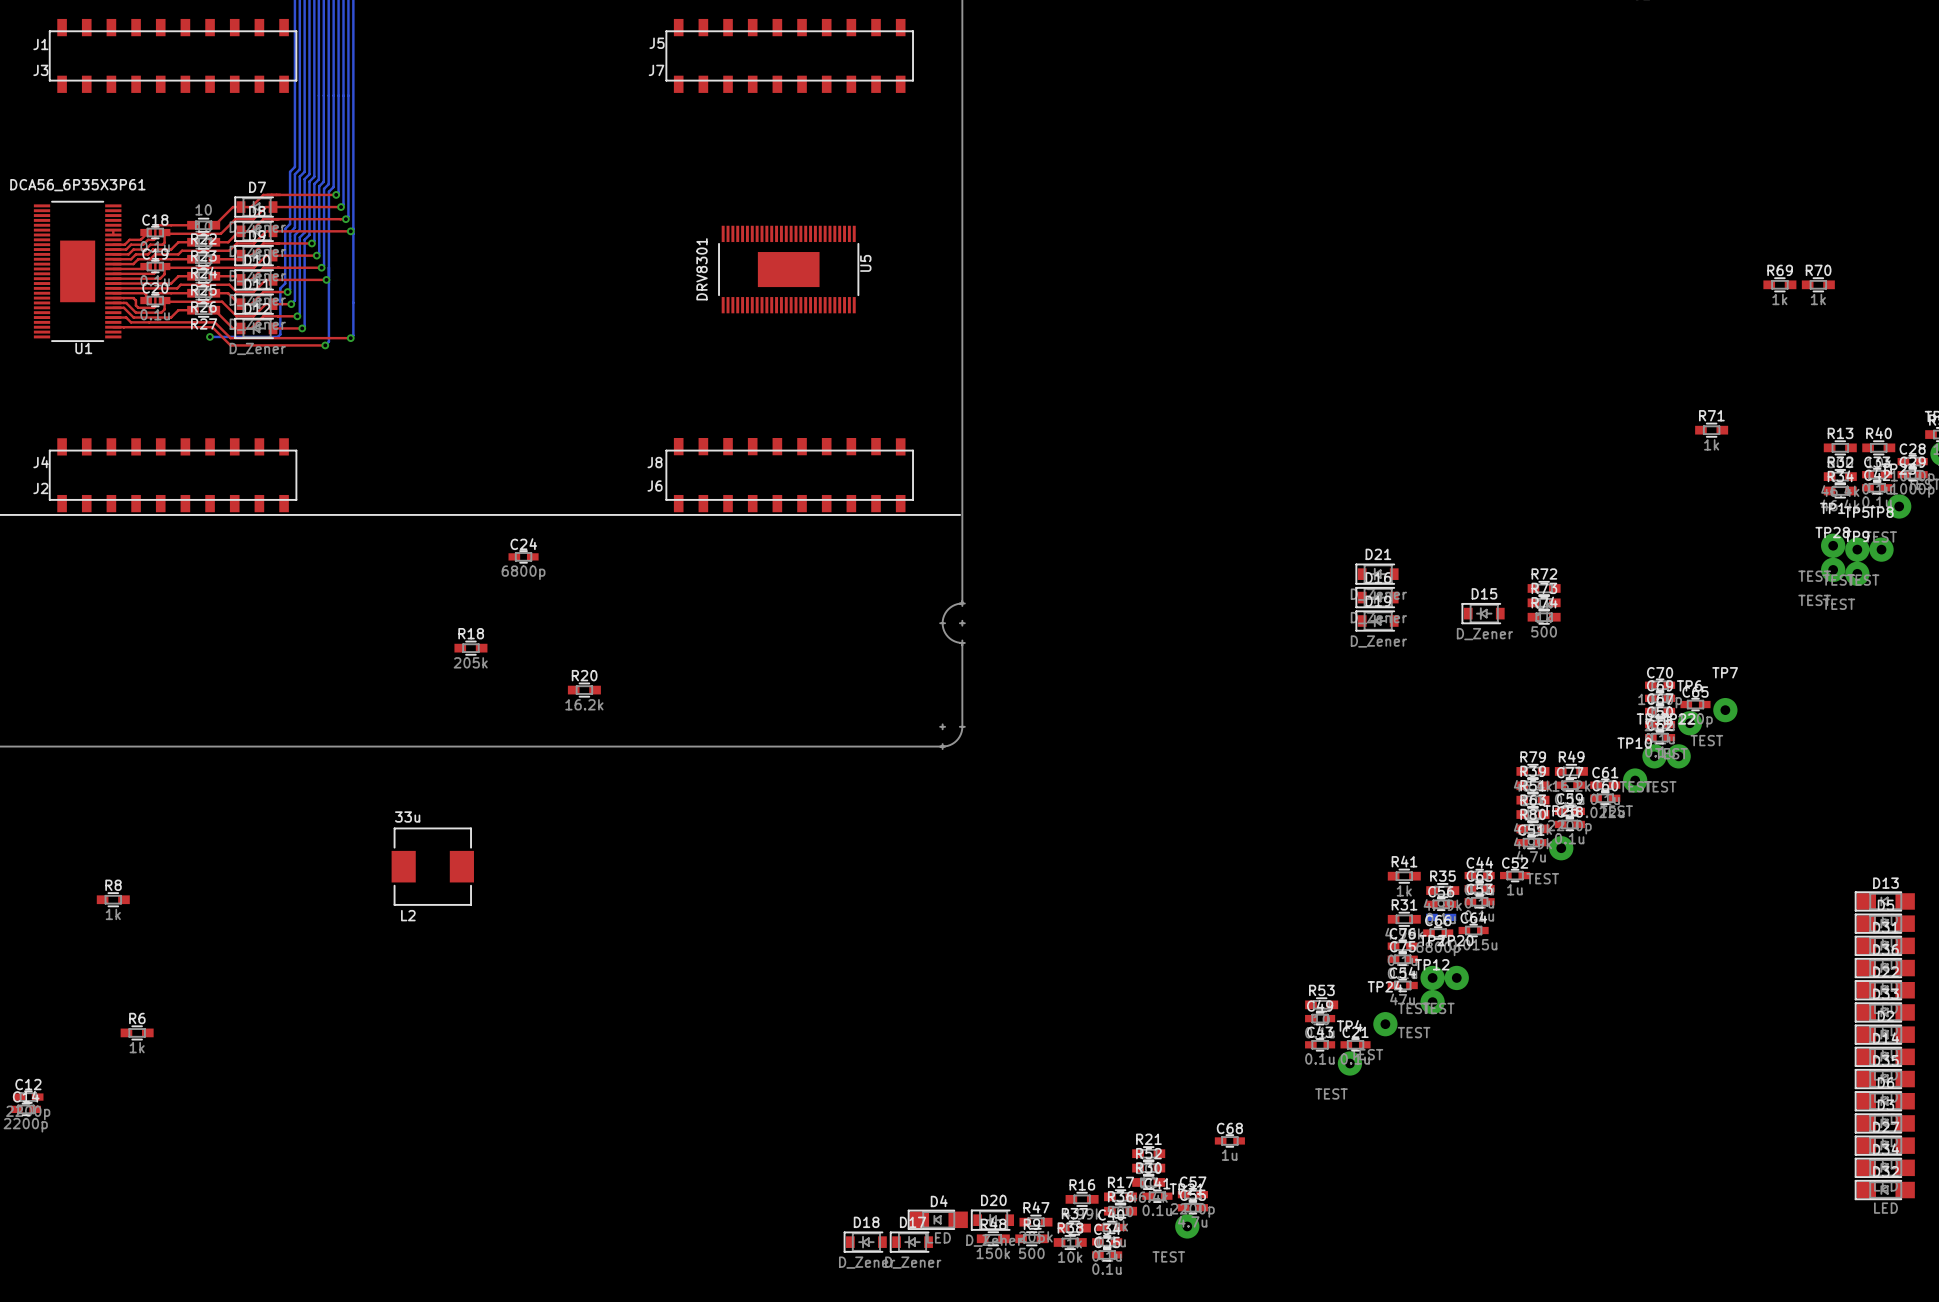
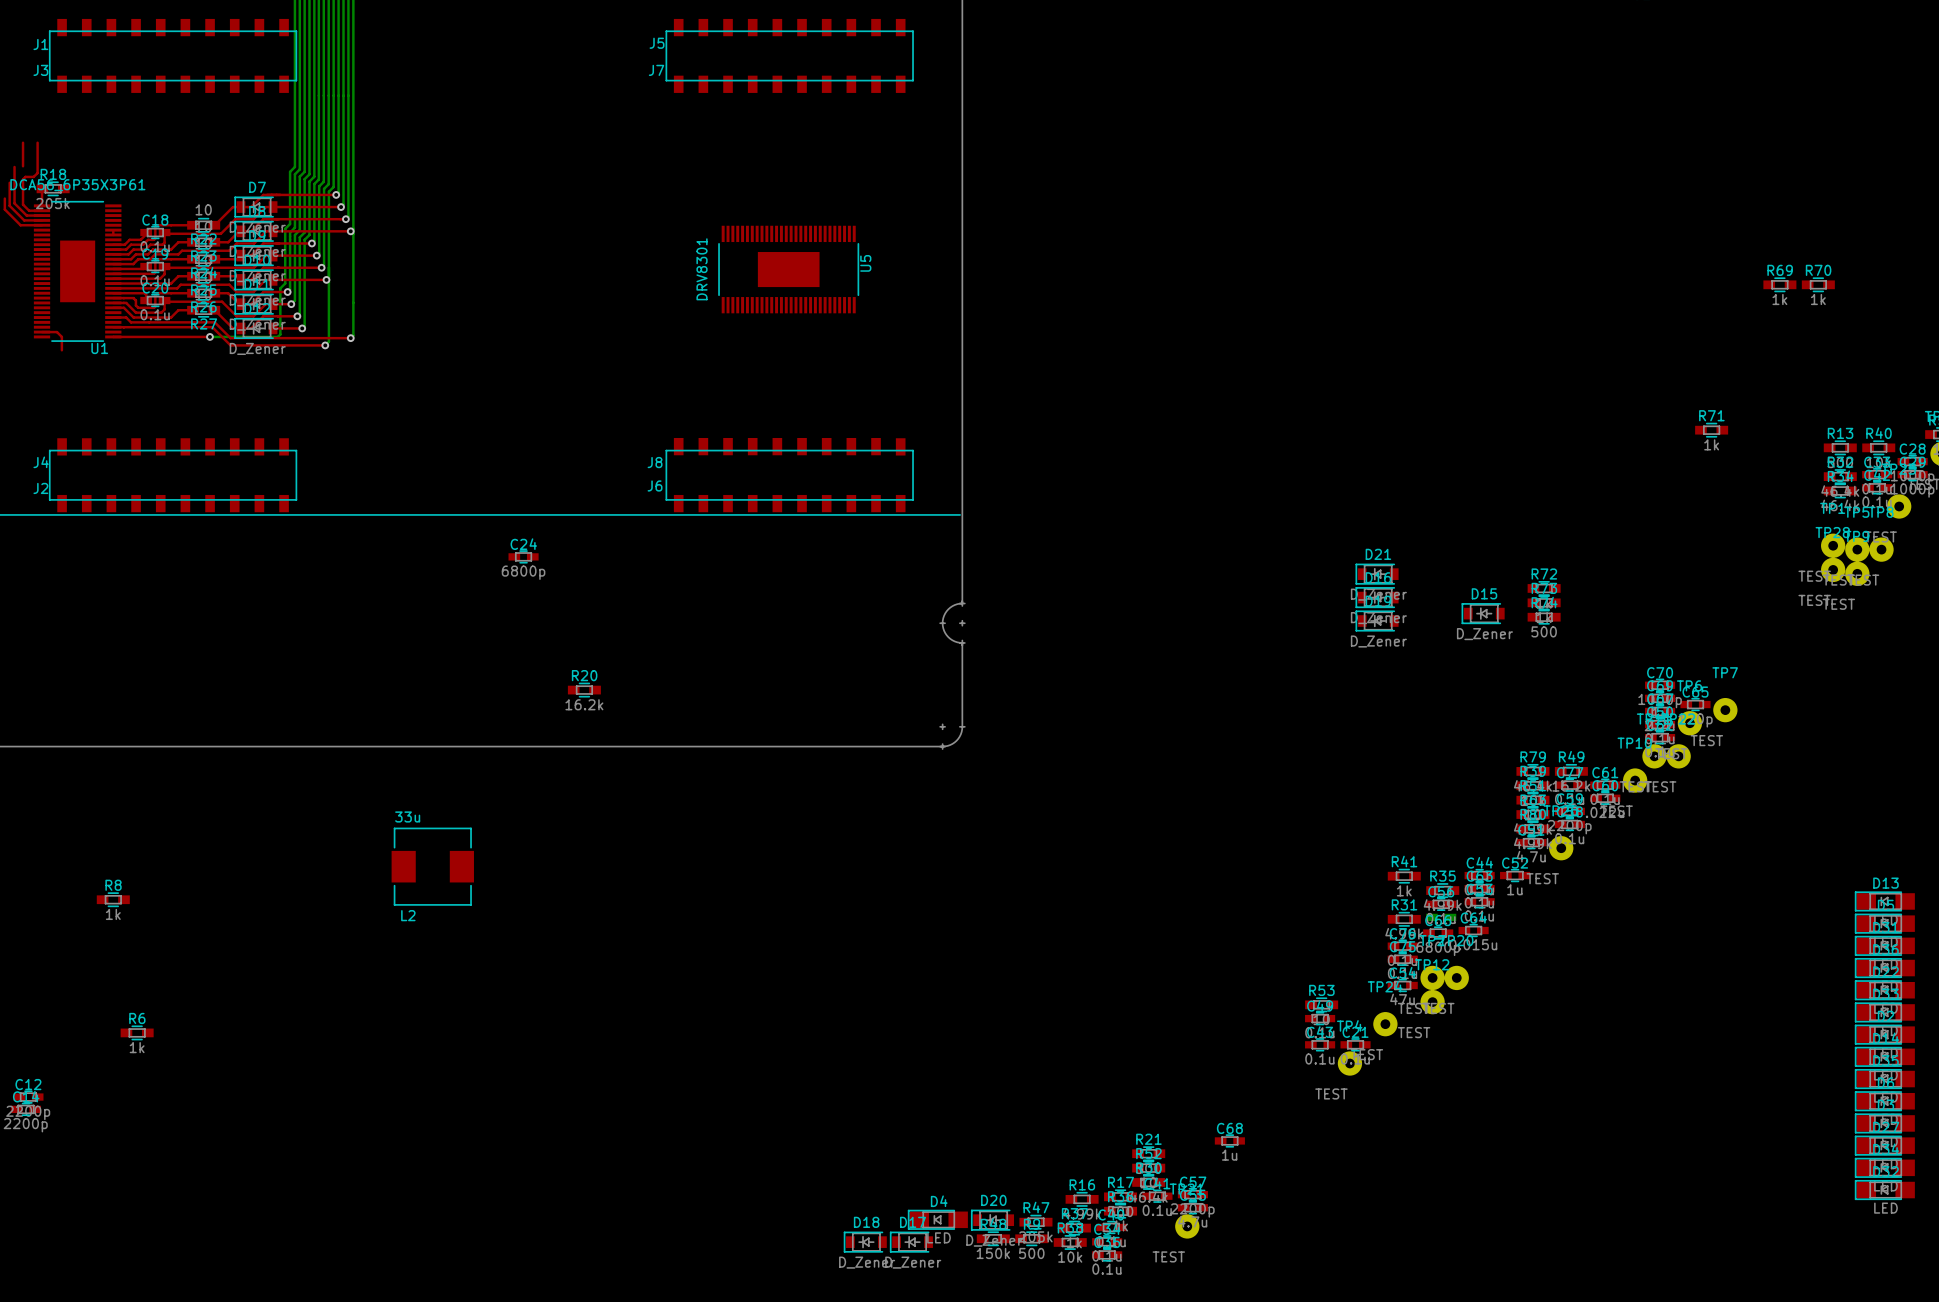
top track: none -> (23, 142) (23, 166)
top track: none -> (37, 142) (37, 173) (33, 176) (25, 176) (23, 179) (23, 204) (29, 210) (42, 210)
top track: none -> (14, 167) (14, 203) (26, 215) (42, 215)
top track: none -> (9, 182) (9, 205) (24, 220) (42, 220)
top track: none -> (42, 188) (42, 205)
top track: none -> (4, 198) (4, 209) (20, 225) (42, 225)
top track: none -> (42, 332) (57, 332) (61, 336) (61, 350)
top track: none -> (113, 336) (209, 336)
U1 name position: U1 (83, 348) -> U1 (99, 348)
R18 position: (470, 648) -> (53, 188)

